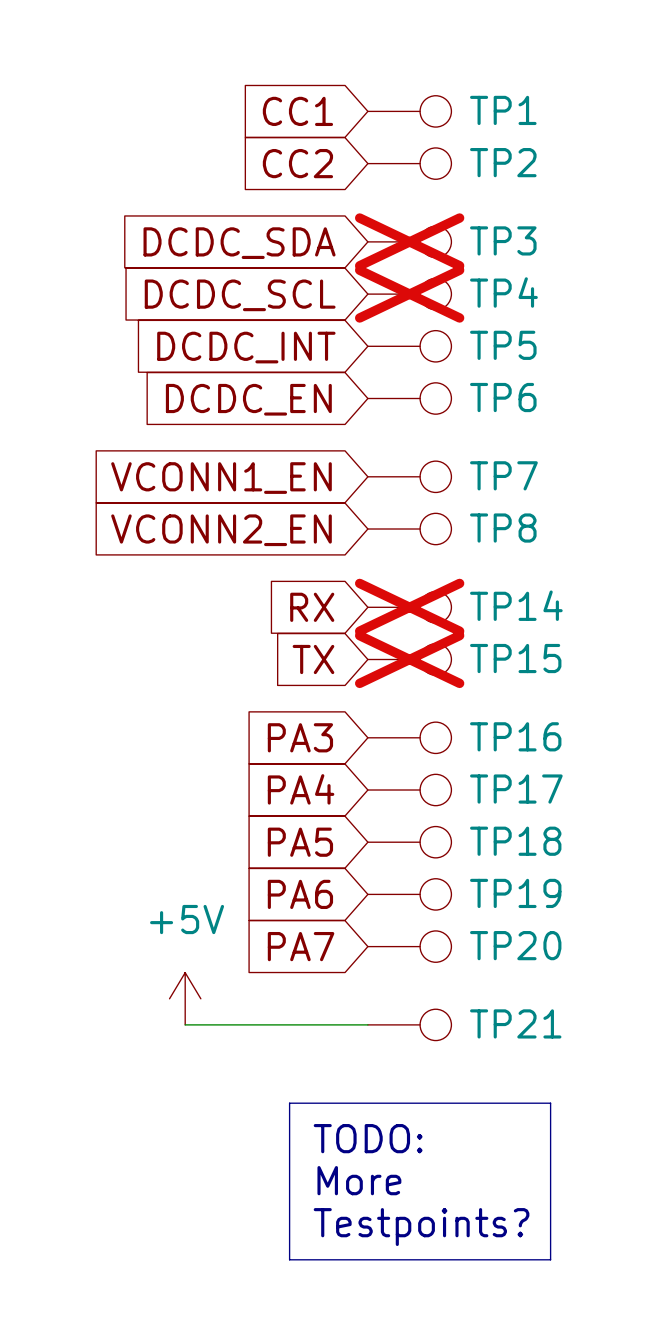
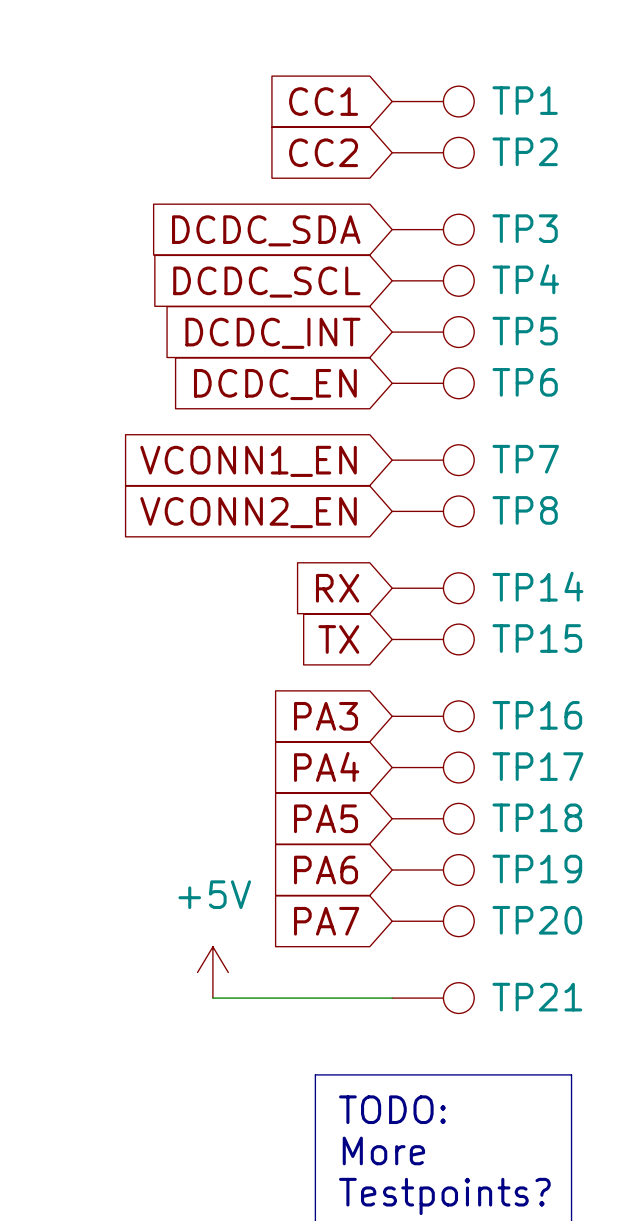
TP3 do-not-place cross: (409, 241) -> none
TP4 do-not-place cross: (409, 294) -> none
TP14 do-not-place cross: (409, 607) -> none
TP15 do-not-place cross: (409, 659) -> none

